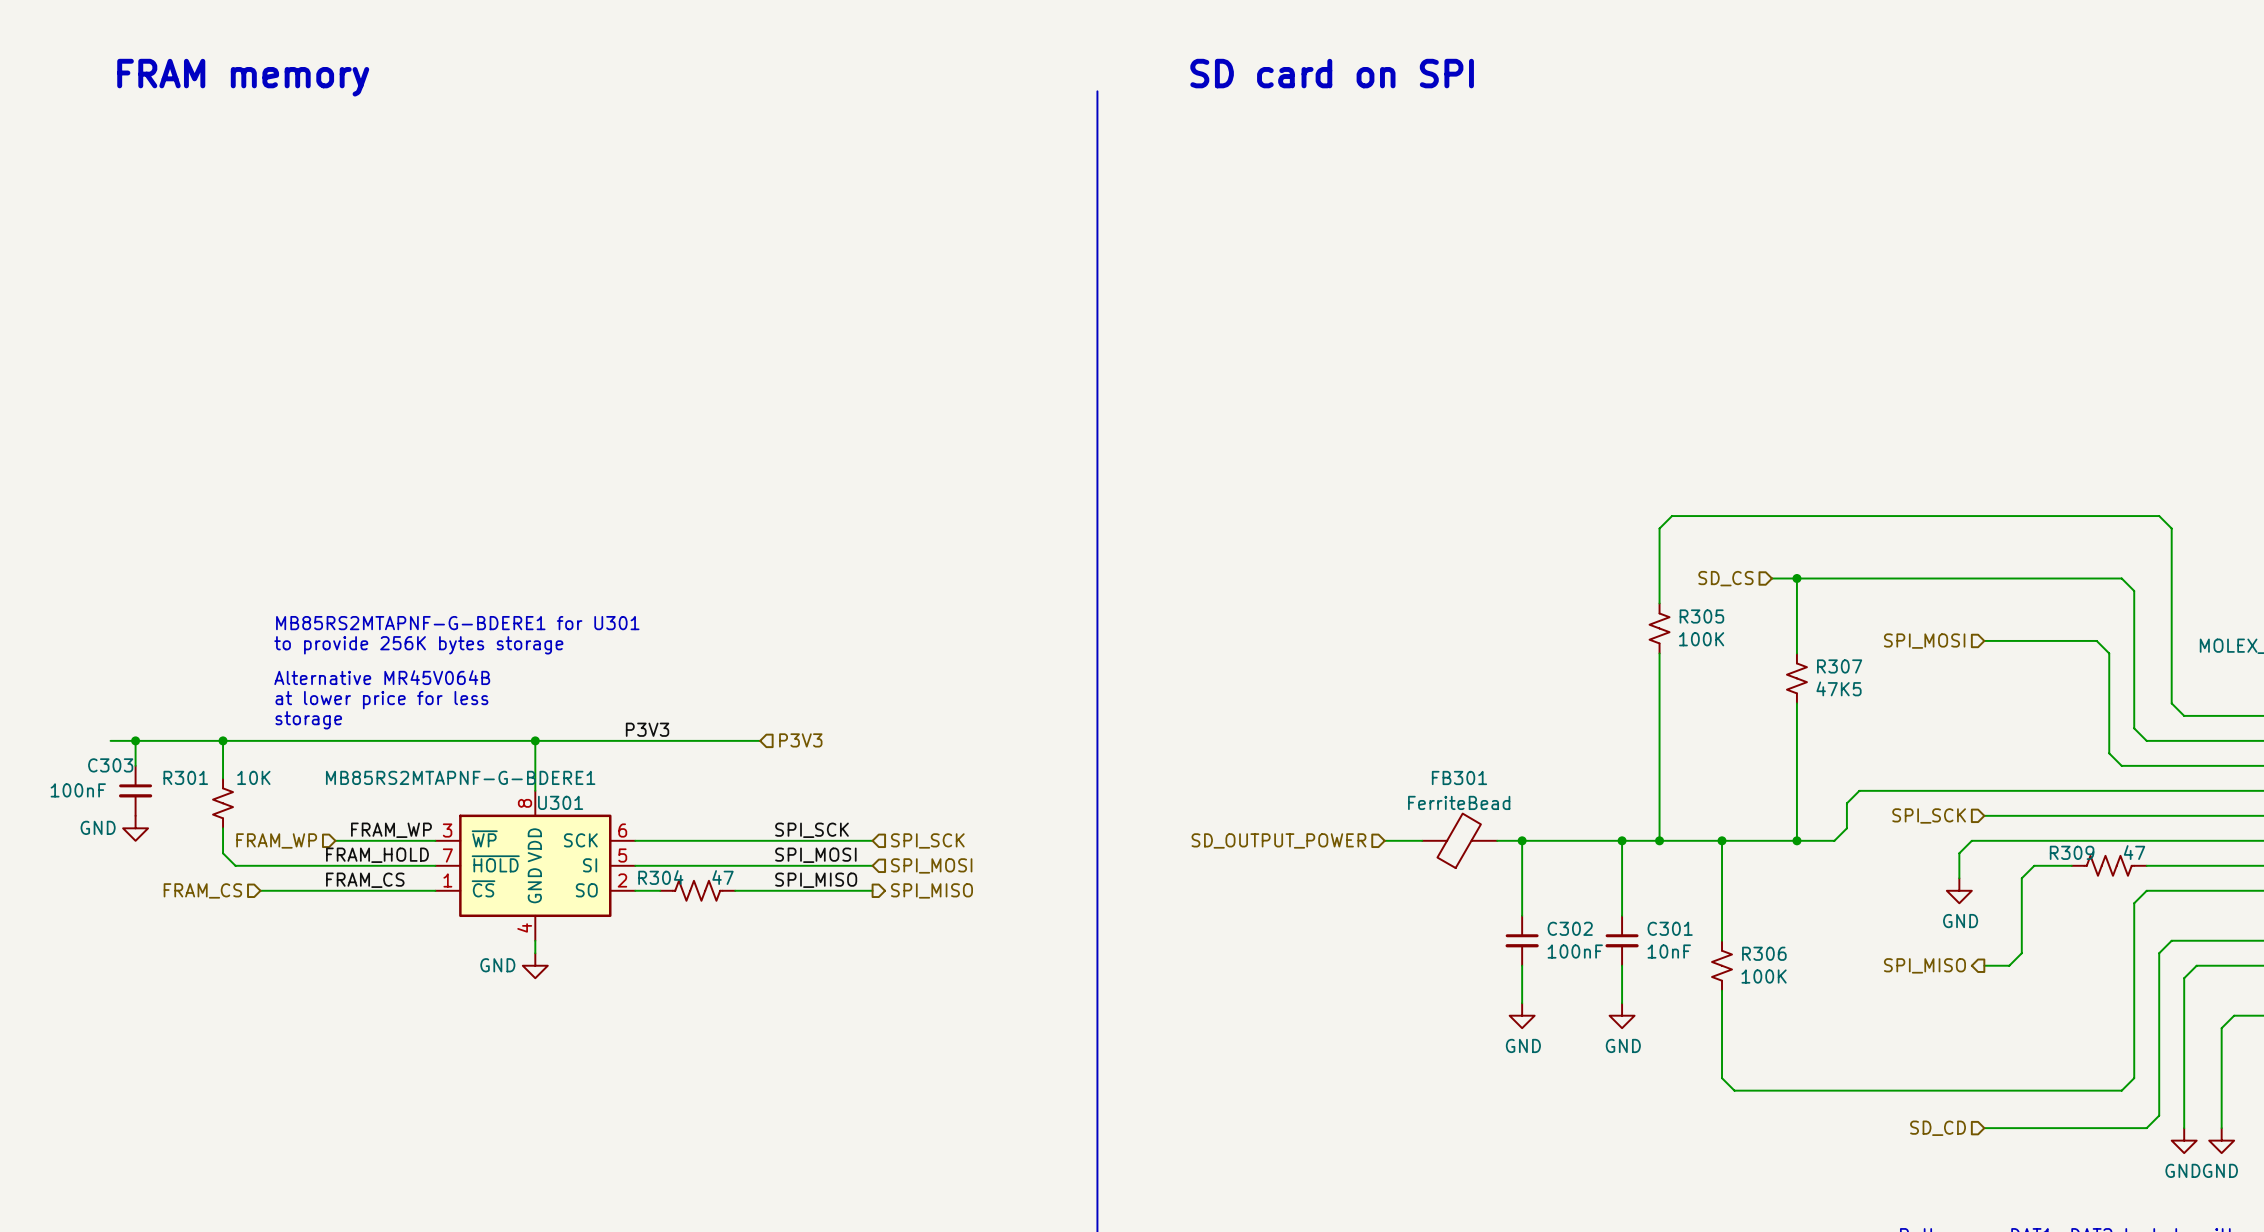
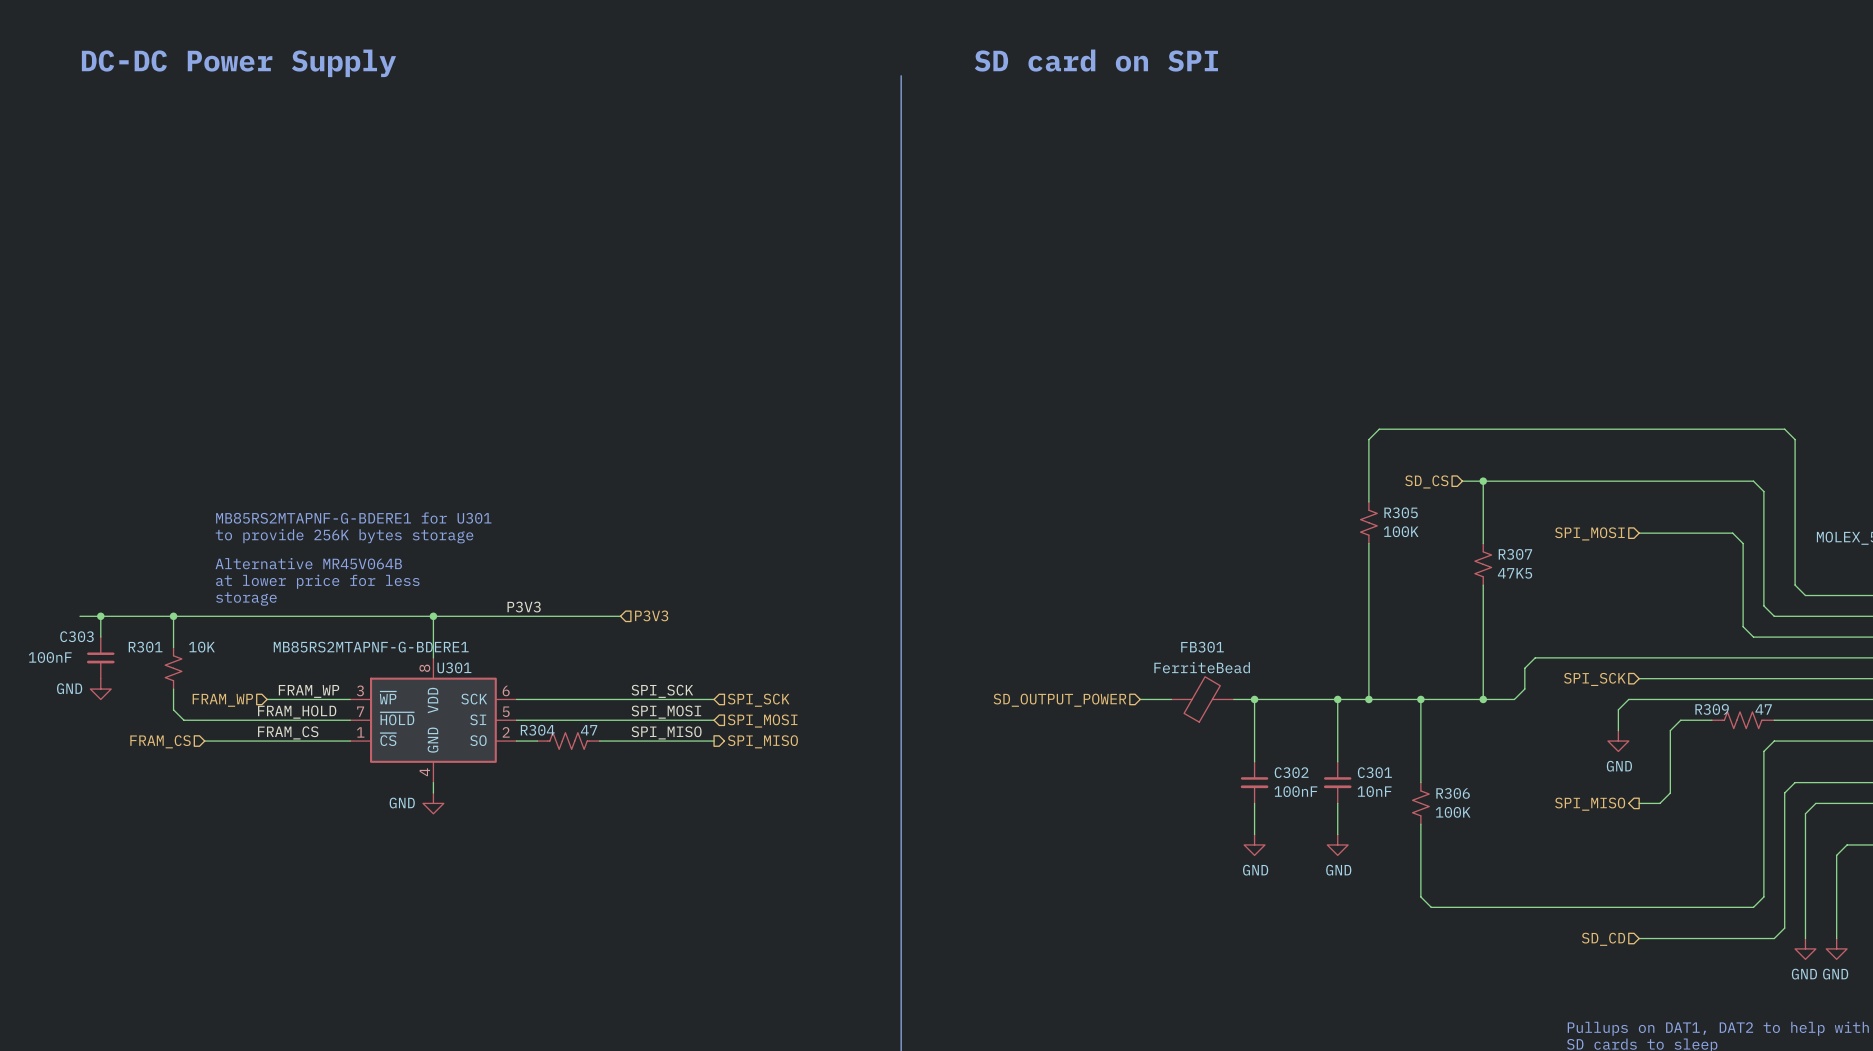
text: FRAM memory (243, 77) -> DC-DC Power Supply (238, 63)

